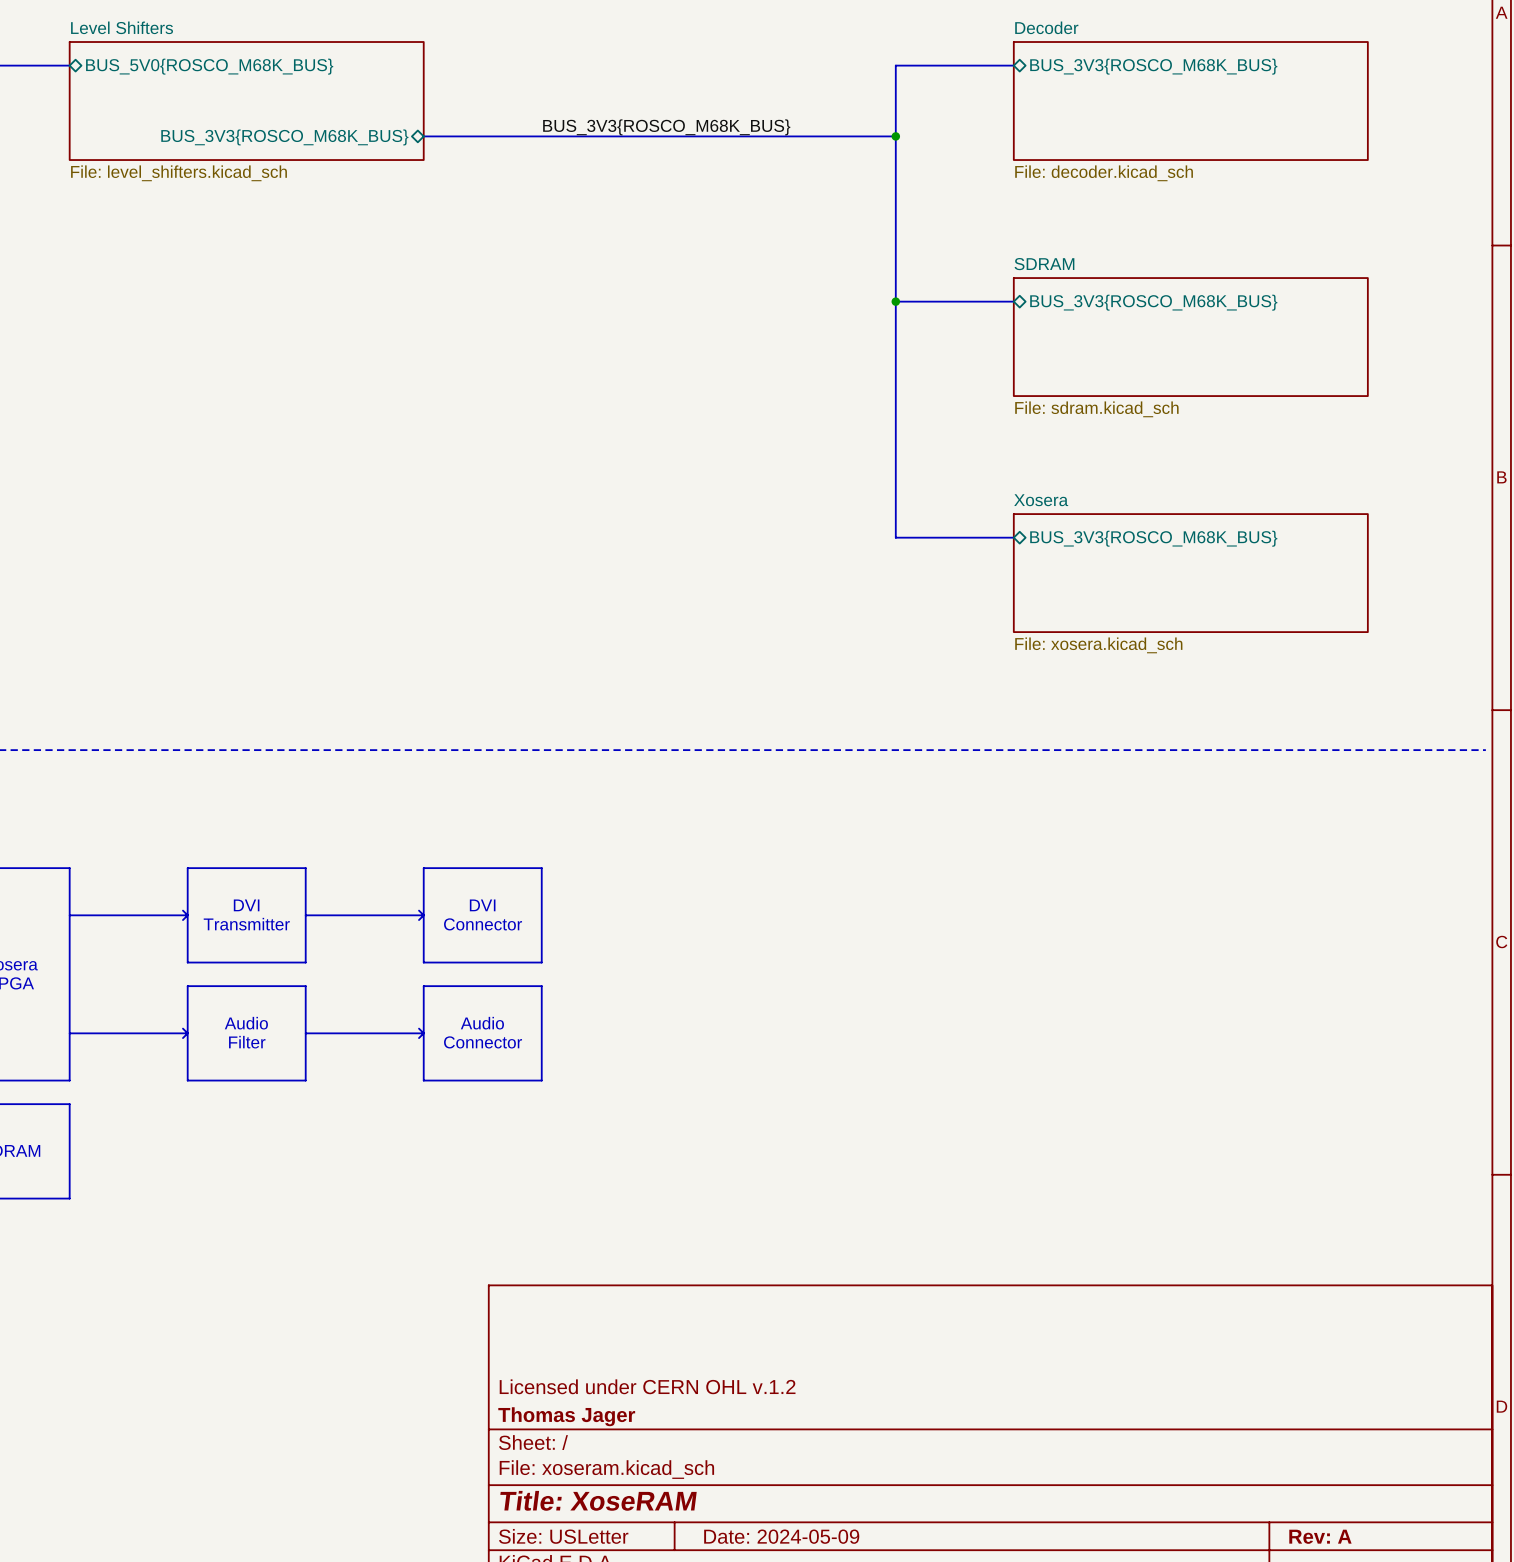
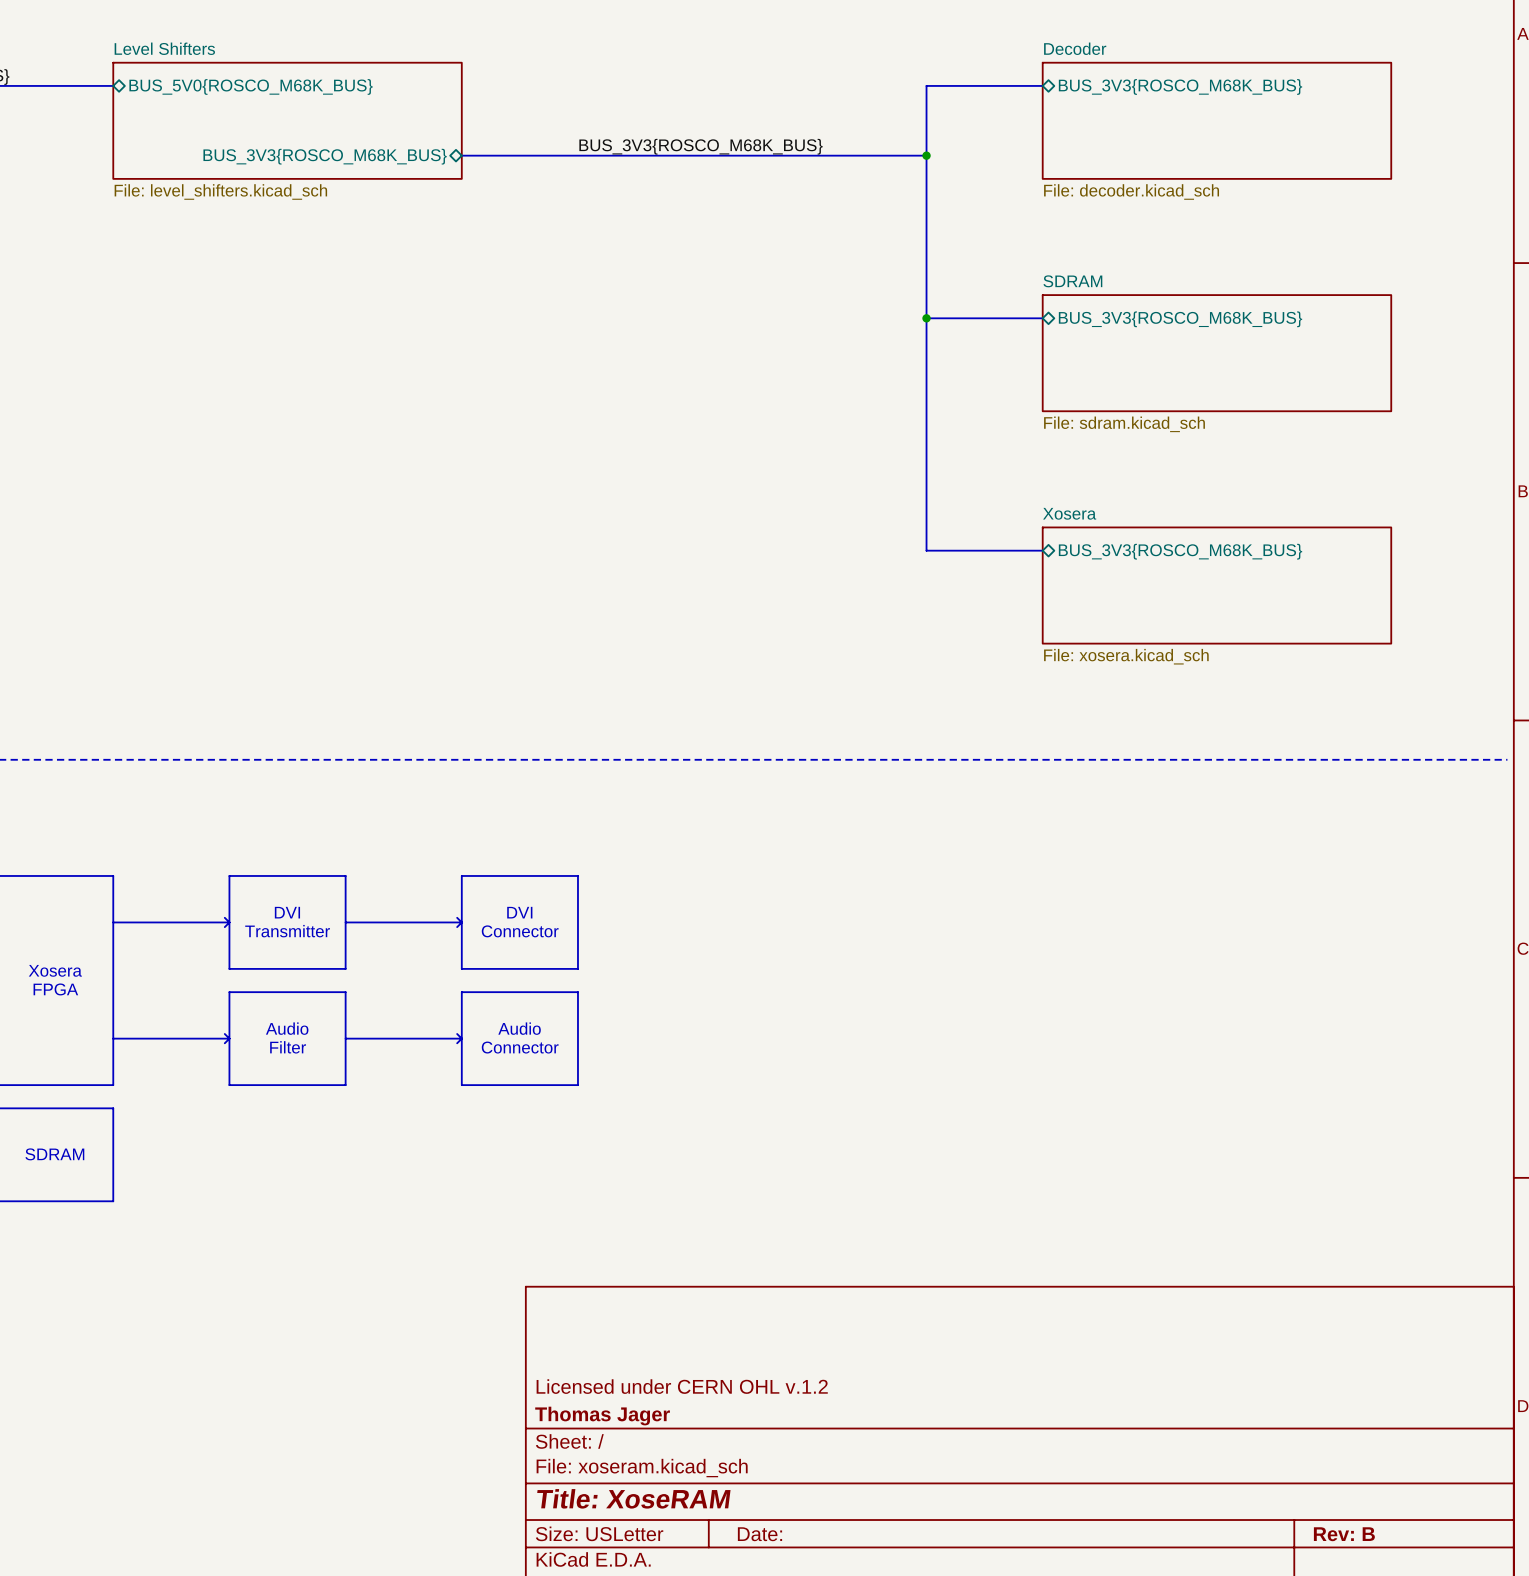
title block: Date: 2024-05-09 (781, 1536) -> Date: (759, 1534)
title block: Rev: A (1320, 1536) -> Rev: B (1344, 1534)

